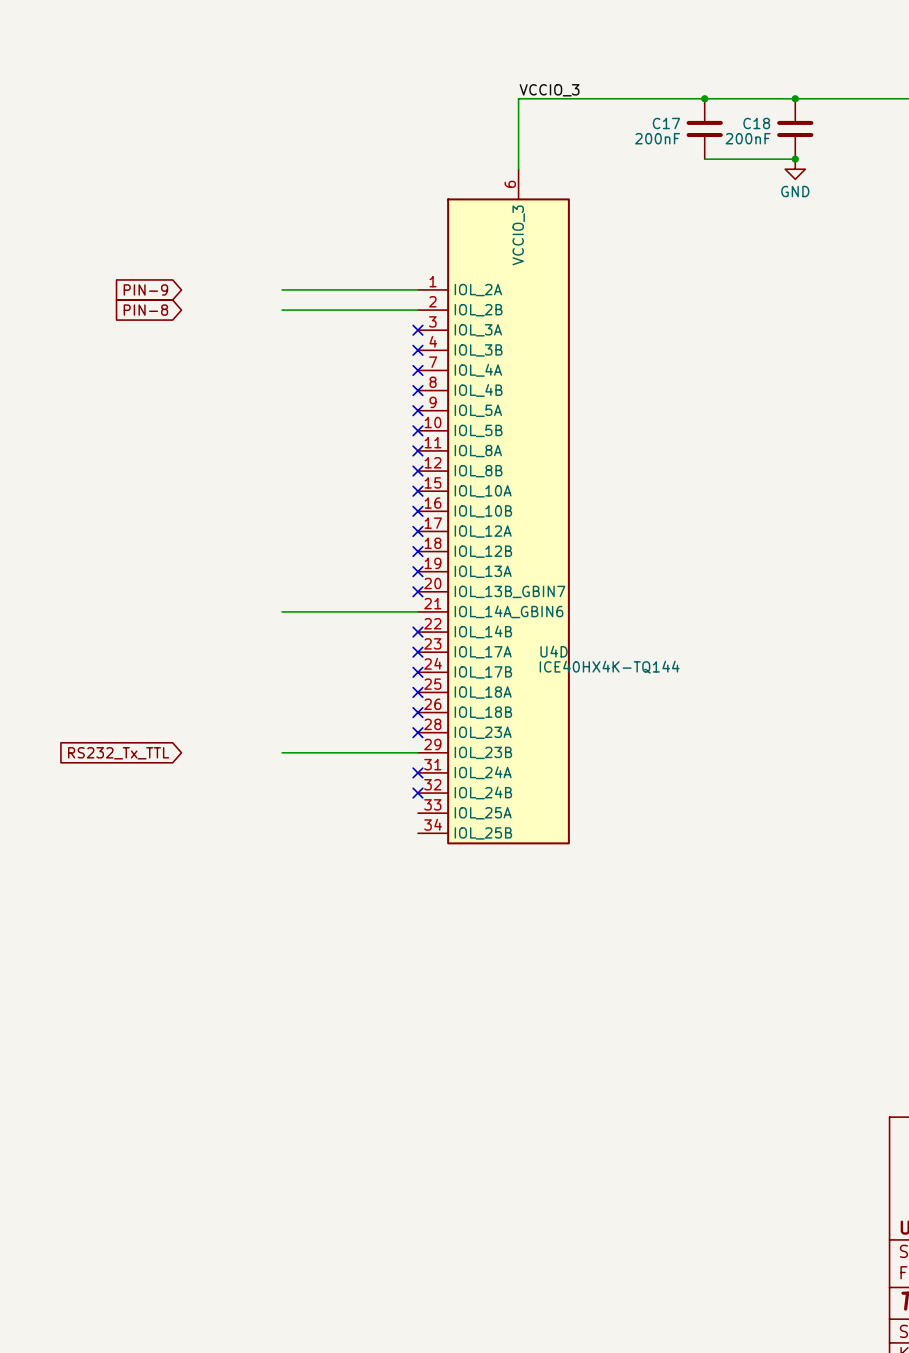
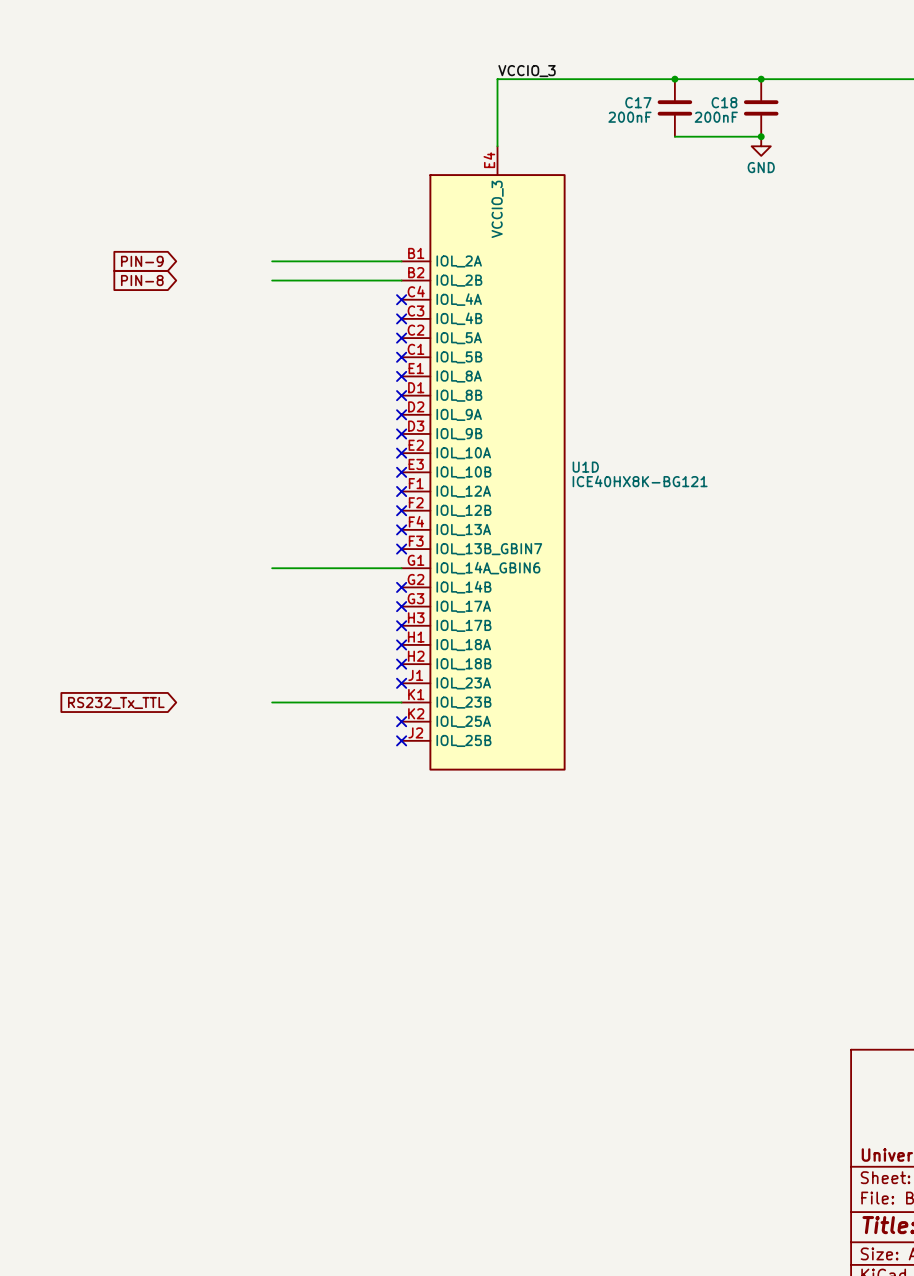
U1D: none -> ICE40HX8K-BG121 (483, 458)
U4D: ICE40HX4K-TQ144 (493, 506) -> none

